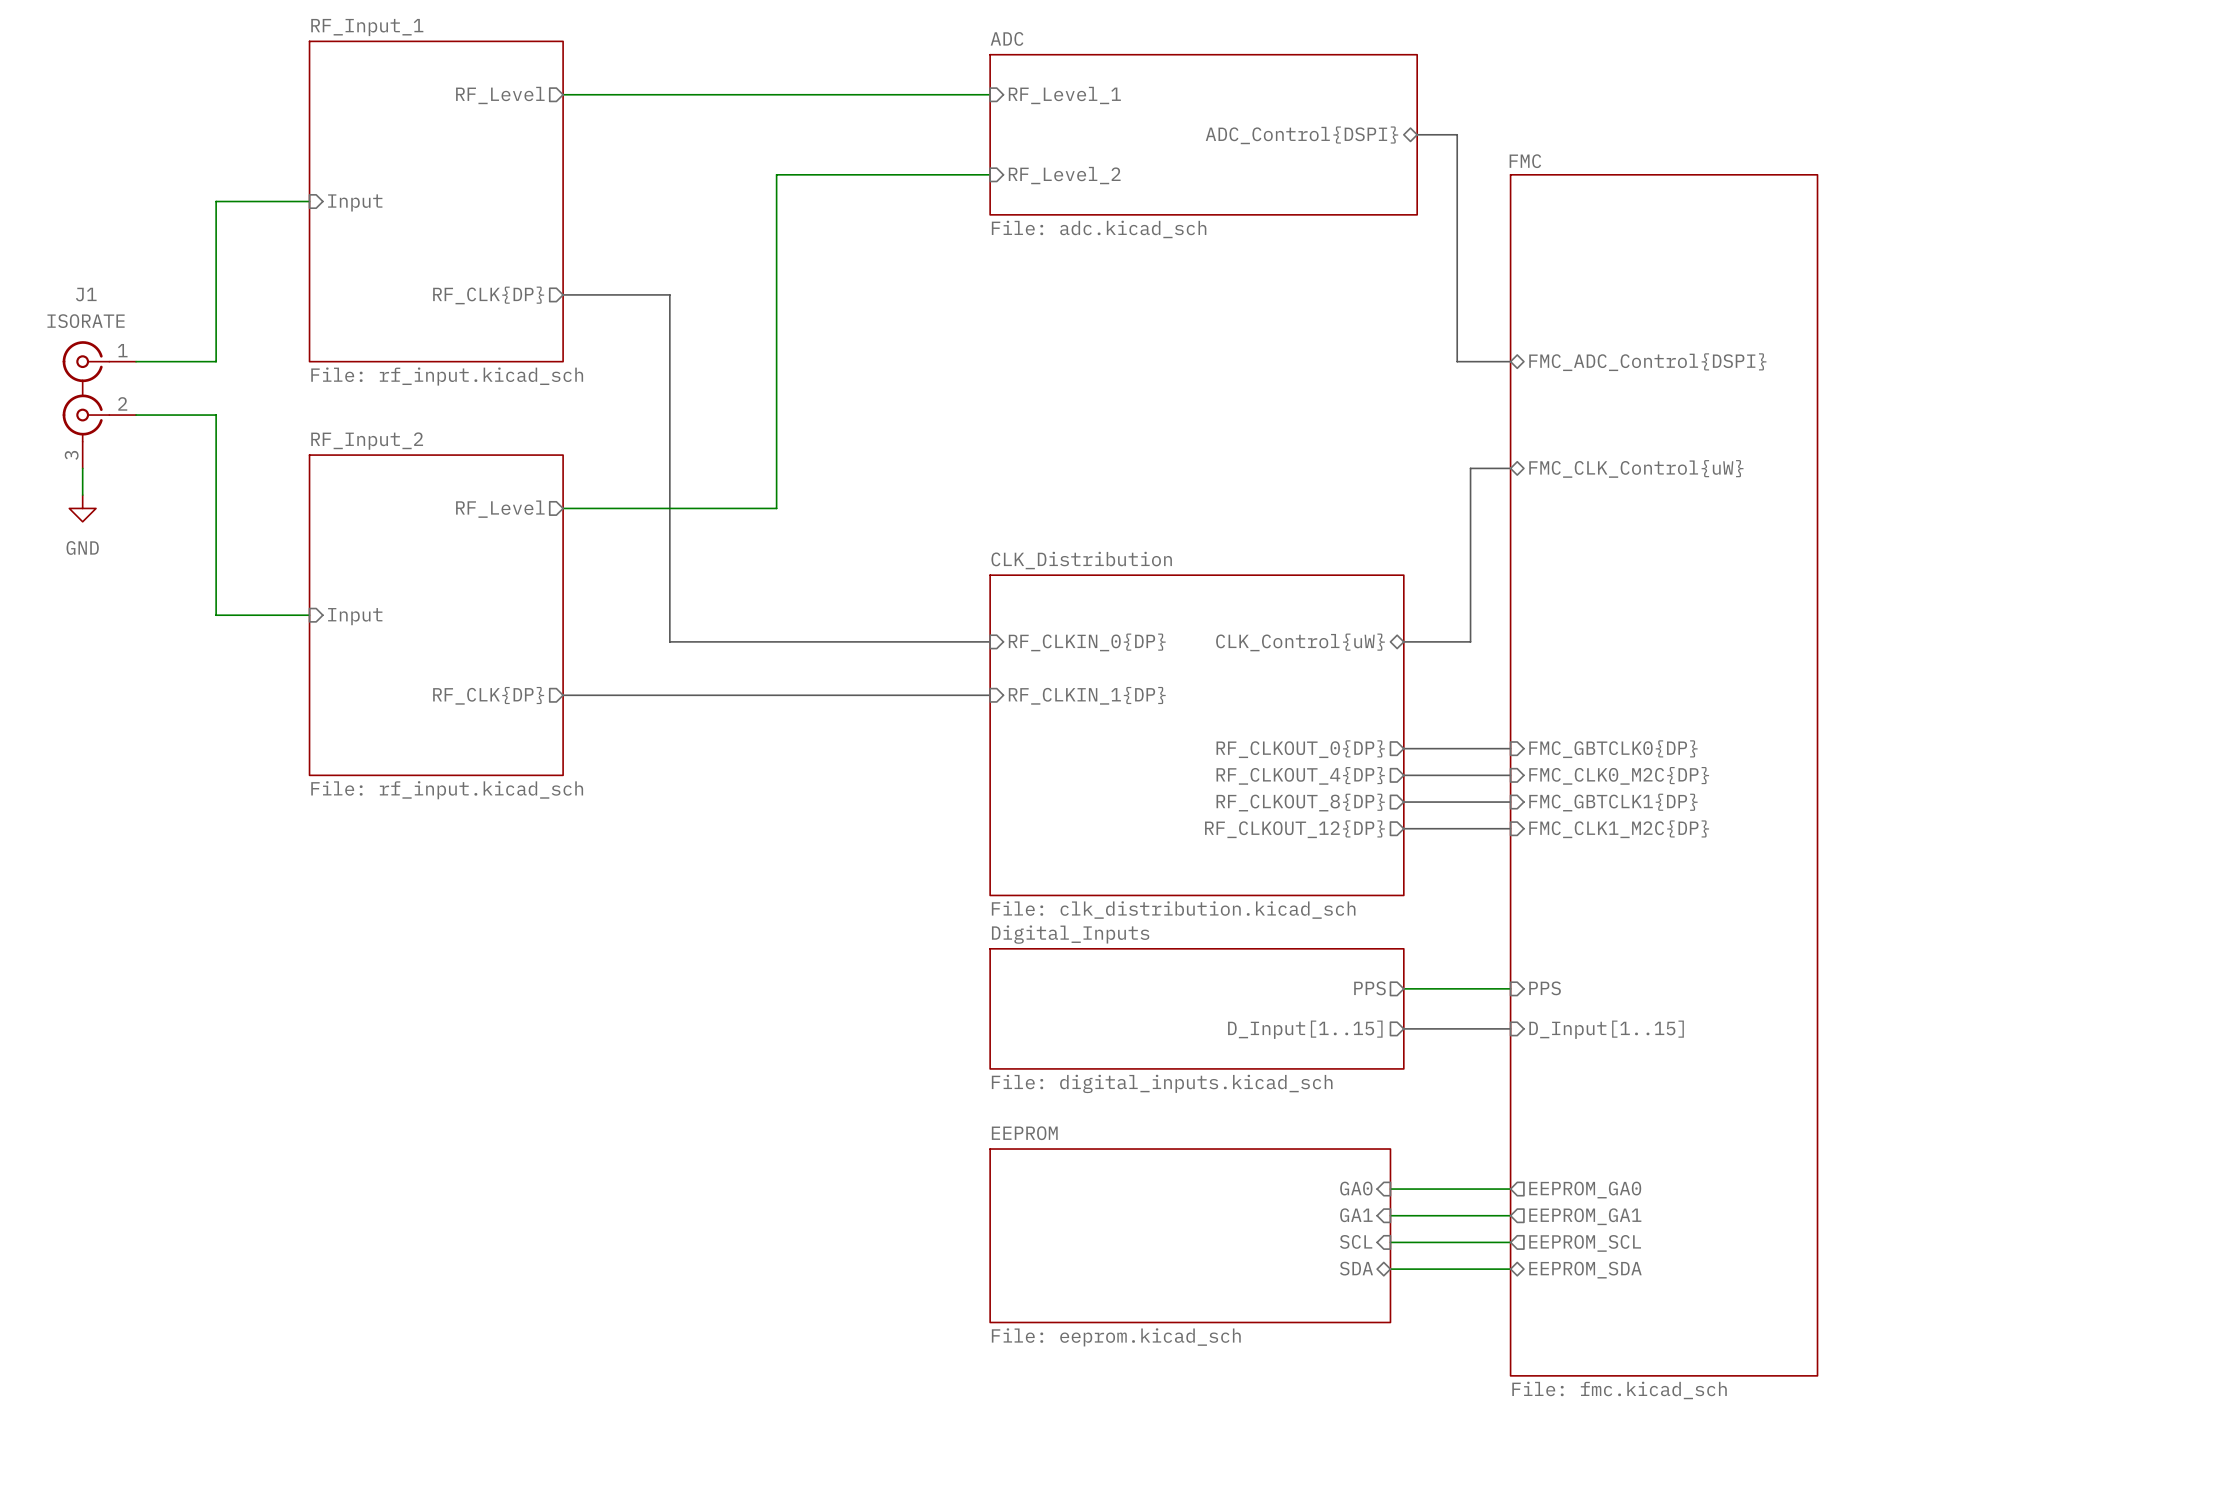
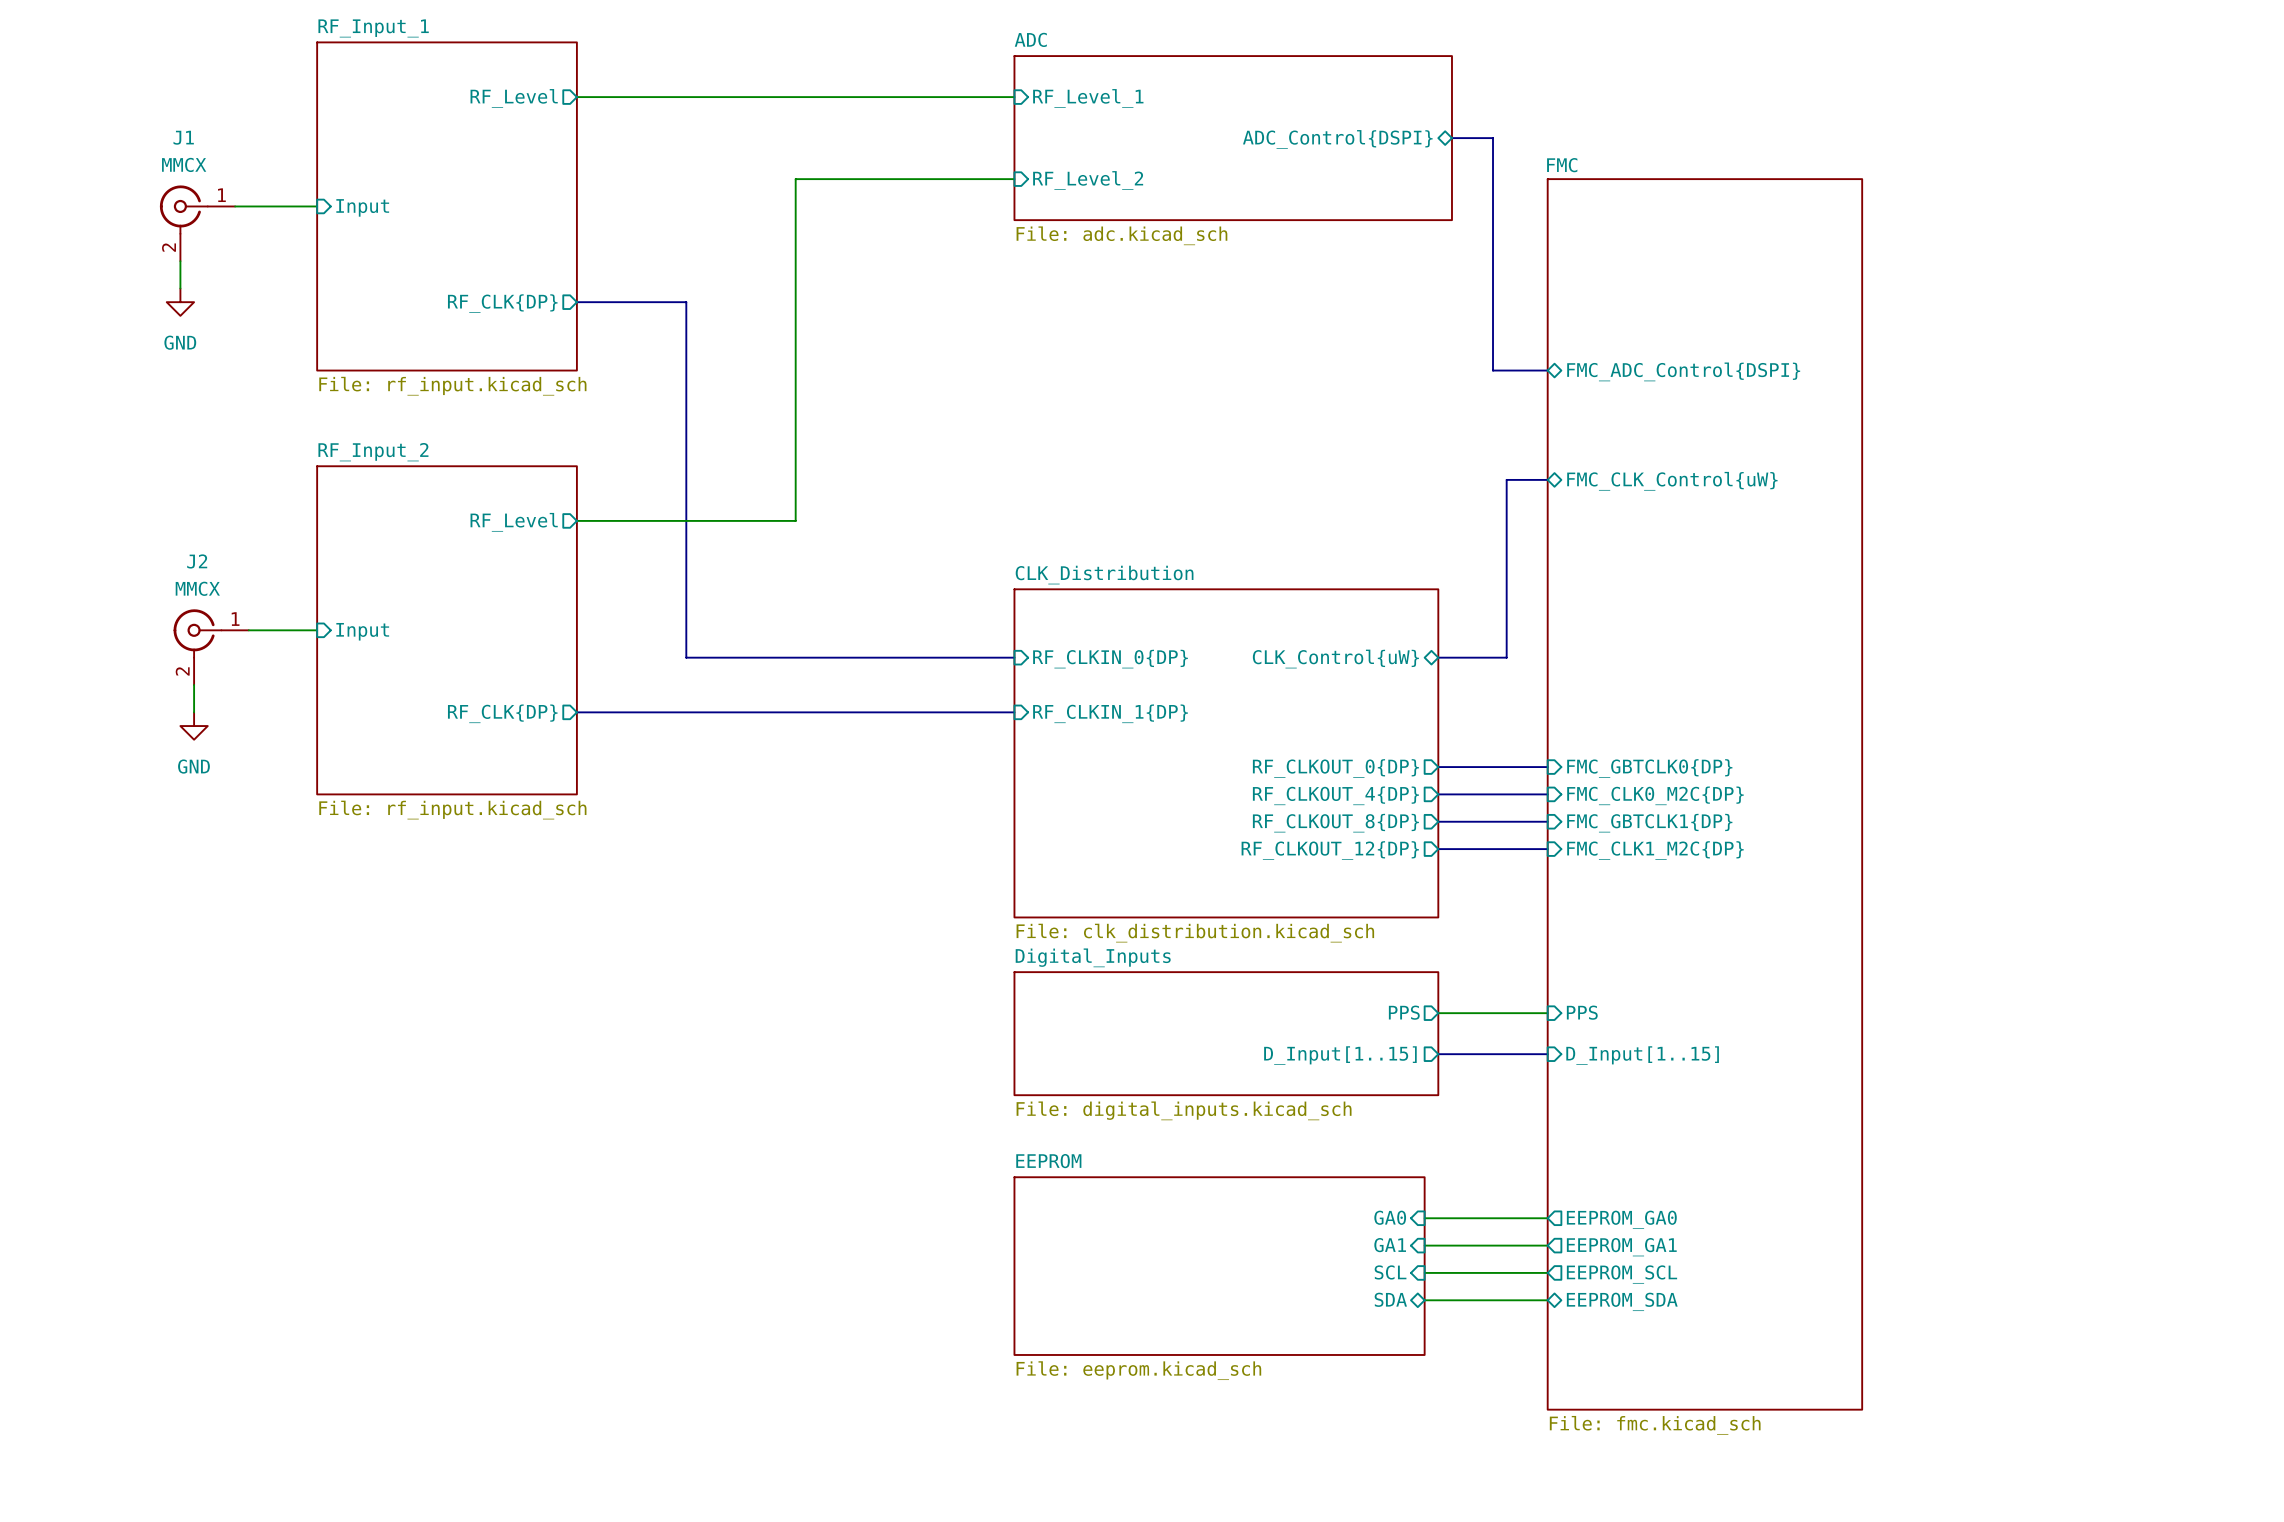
wire: (229, 201) (216, 201) (216, 361) (136, 361) -> none
wire: none -> (180, 261) (180, 288)
J1 name position: J1 (86, 294) -> J1 (183, 137)
power symbol: none -> GND (180, 302)
J1 value: ISORATE (86, 321) -> MMCX (184, 164)
J1 symbol: [62, 341, 137, 469] -> [159, 185, 236, 262]
wire: (136, 415) (216, 415) (216, 615) (242, 615) -> none
wire: (82, 468) (82, 495) -> (194, 685) (194, 712)
power symbol: GND (82, 508) -> none
J2: none -> MMCX (211, 647)
power symbol: none -> GND (194, 726)

